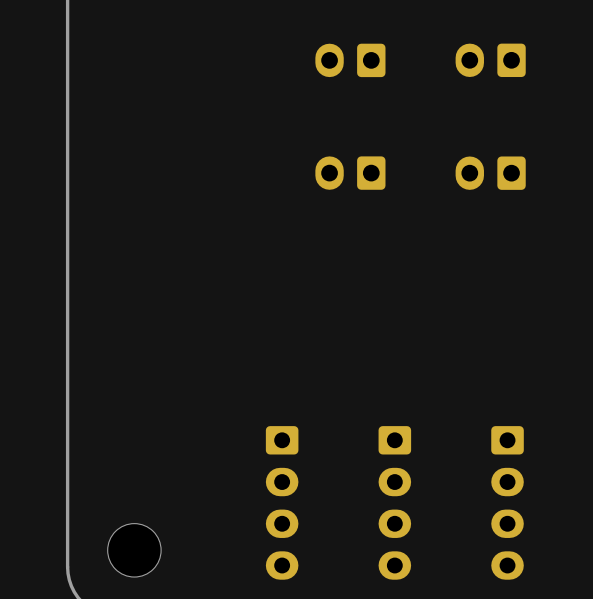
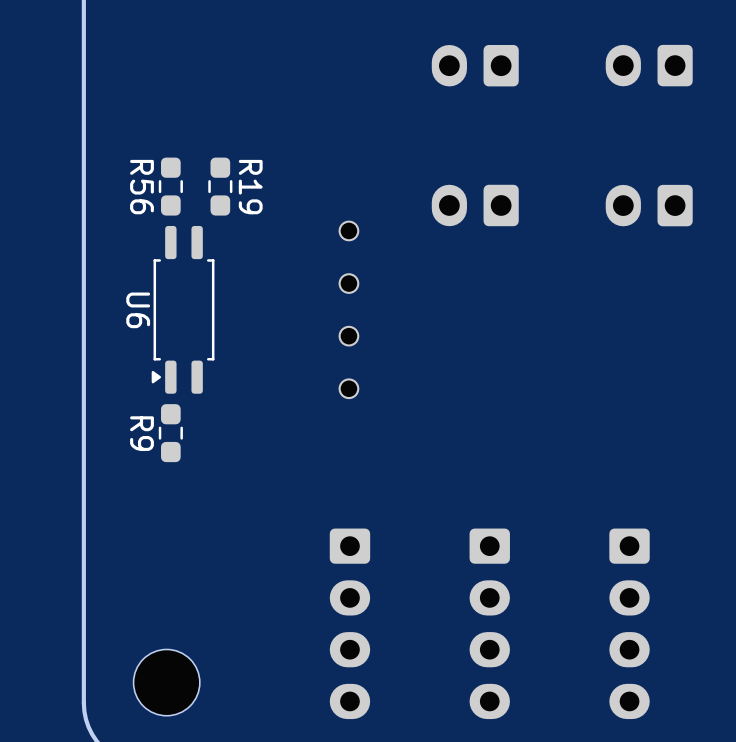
part position: (350, 60) -> (475, 65)
part position: (490, 60) -> (649, 65)
R56: none -> (170, 186)
R19: none -> (220, 186)
part position: (350, 173) -> (475, 205)
part position: (490, 173) -> (649, 205)
U6: none -> (183, 309)
part: none -> (348, 309)
R9: none -> (170, 433)

